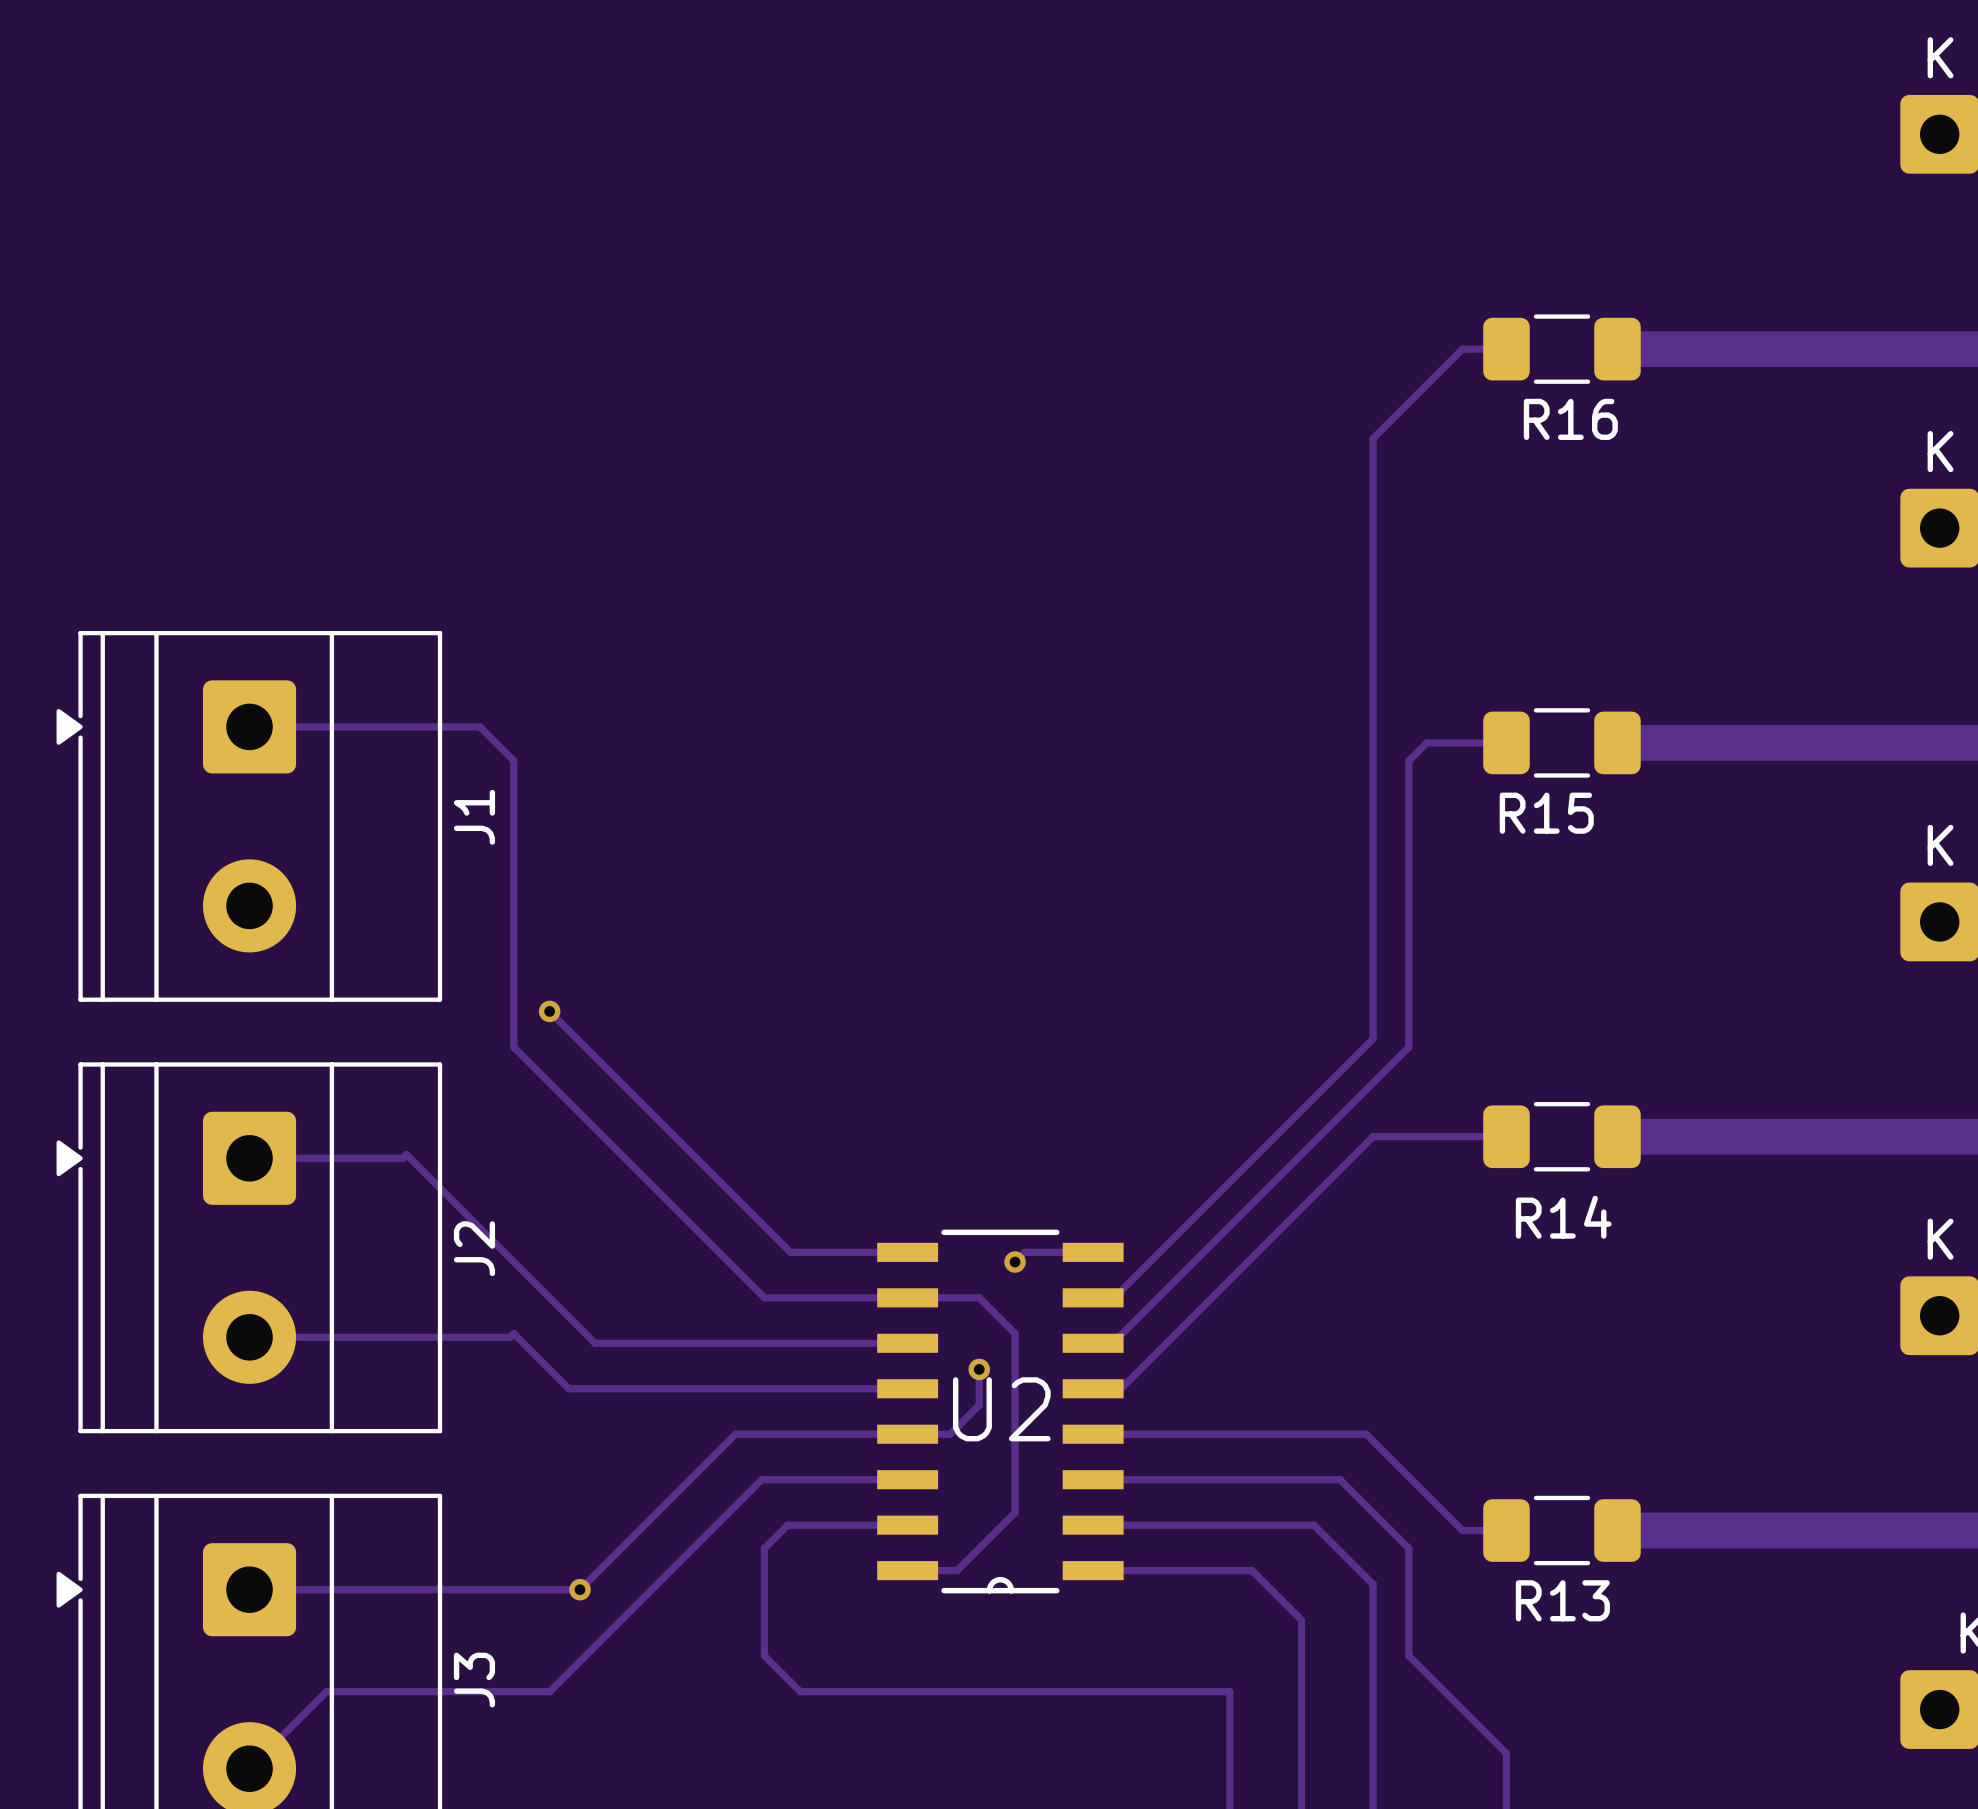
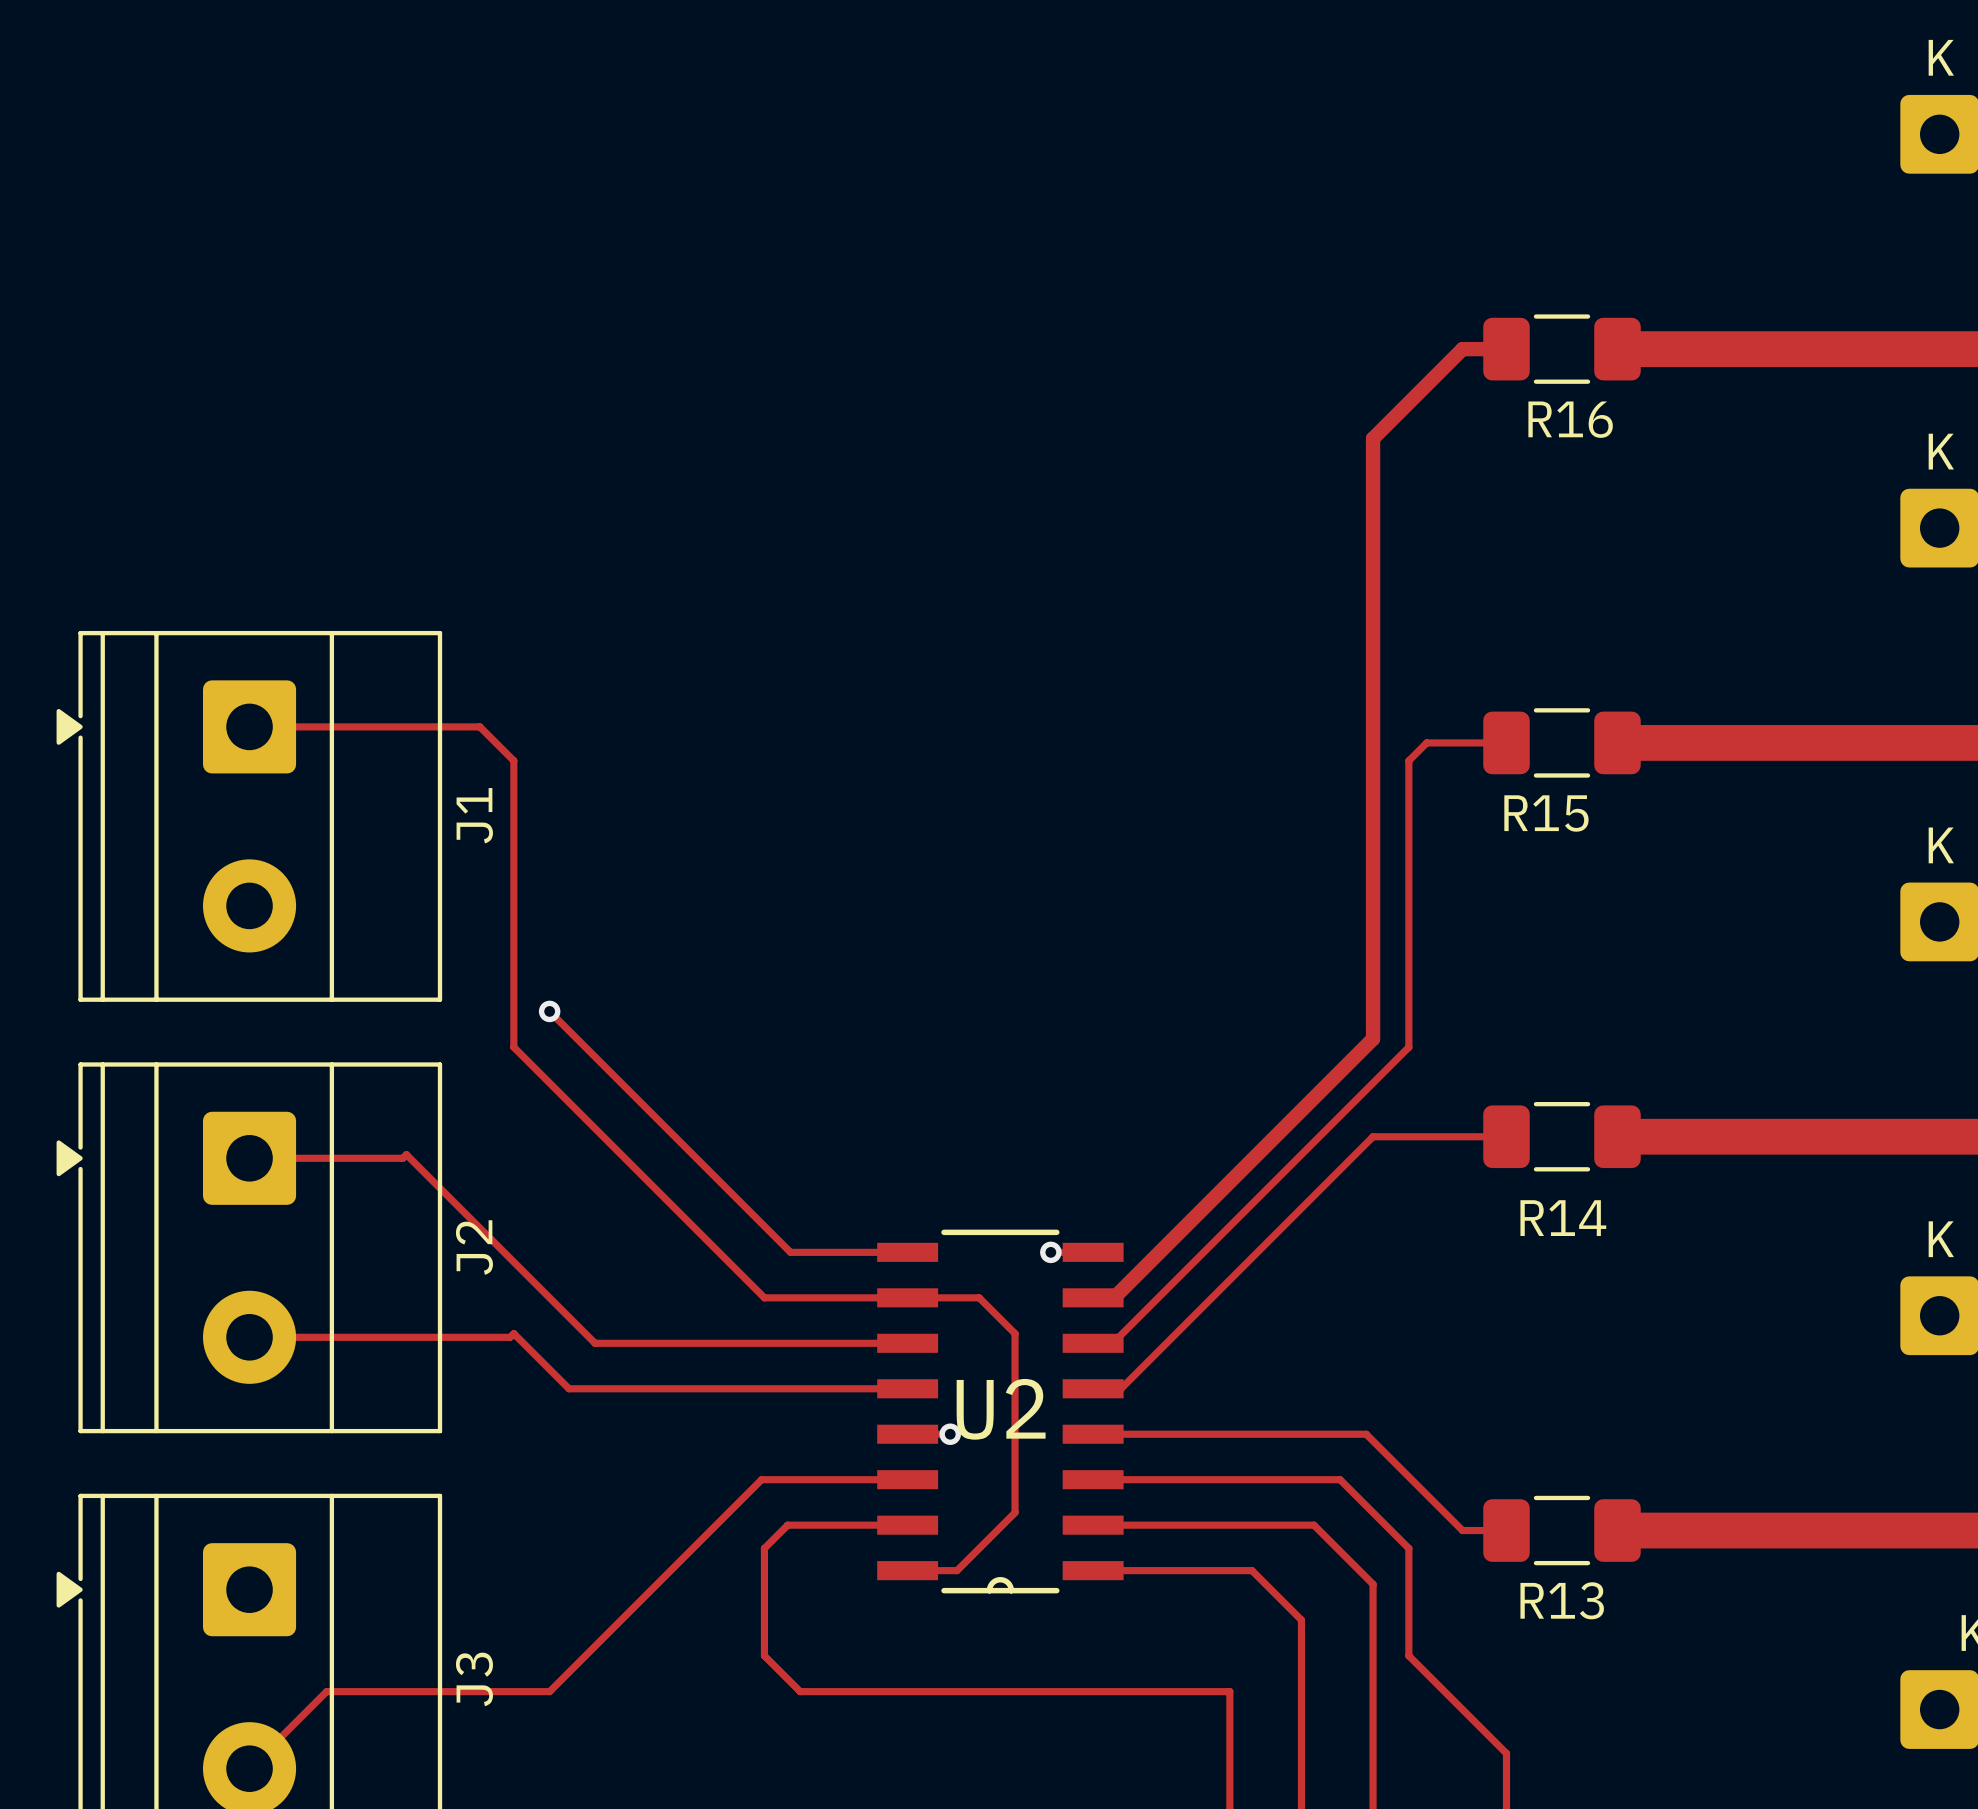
track width: thin (1506, 349) (1462, 349) (1373, 438) (1373, 1038) (1114, 1297) (1093, 1297) -> thick (1506, 349) (1462, 349) (1373, 438) (1373, 1038) (1114, 1297) (1093, 1297)
track: (1050, 1252) (1024, 1252) (1015, 1262) -> none
via position: (1015, 1262) -> (1050, 1252)
track: (979, 1369) (979, 1405) (950, 1434) -> none
via: (979, 1369) -> none
track: (907, 1434) (735, 1434) (579, 1589) (249, 1589) -> none
via: none -> (950, 1434)
via: (579, 1589) -> none

